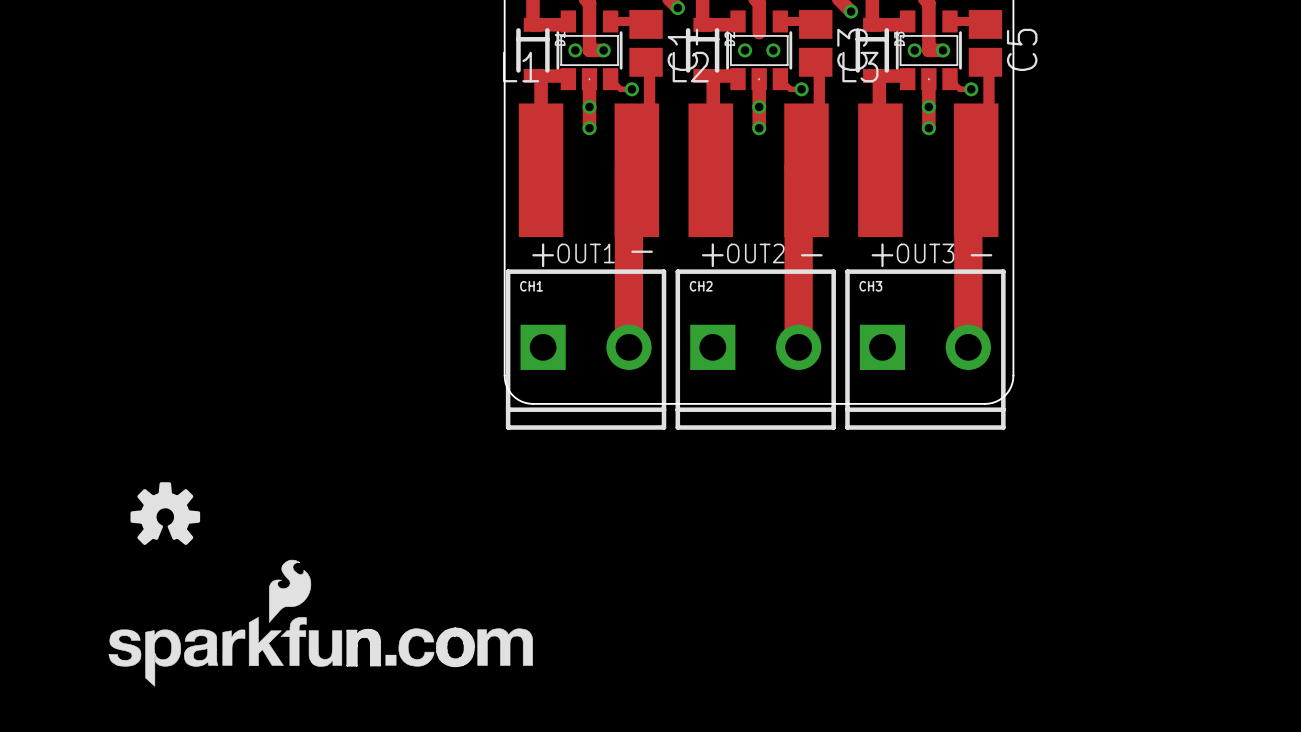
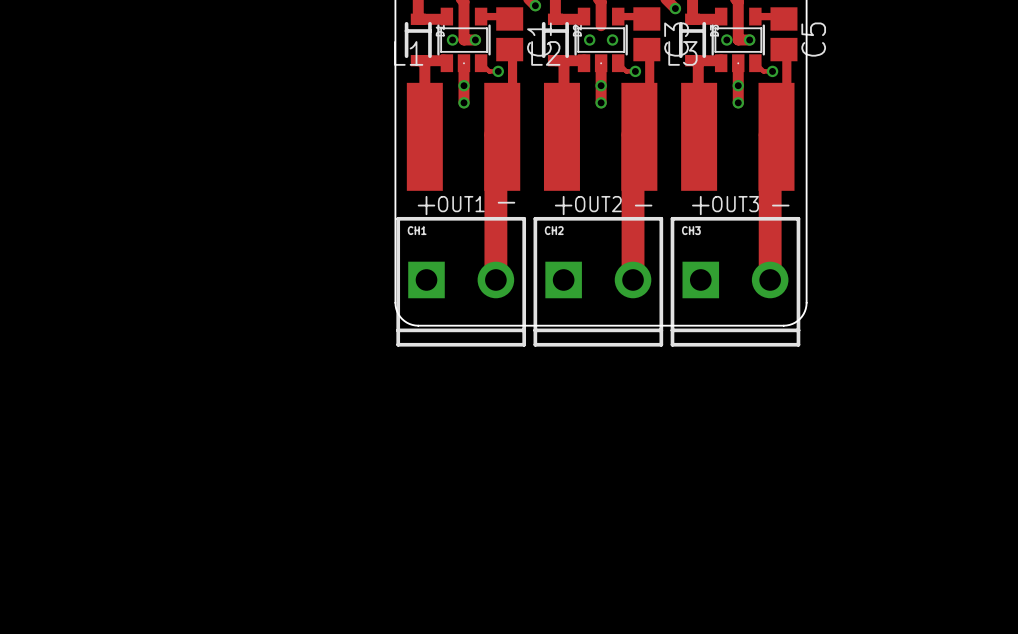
drawing: [108, 482, 533, 687] -> none

